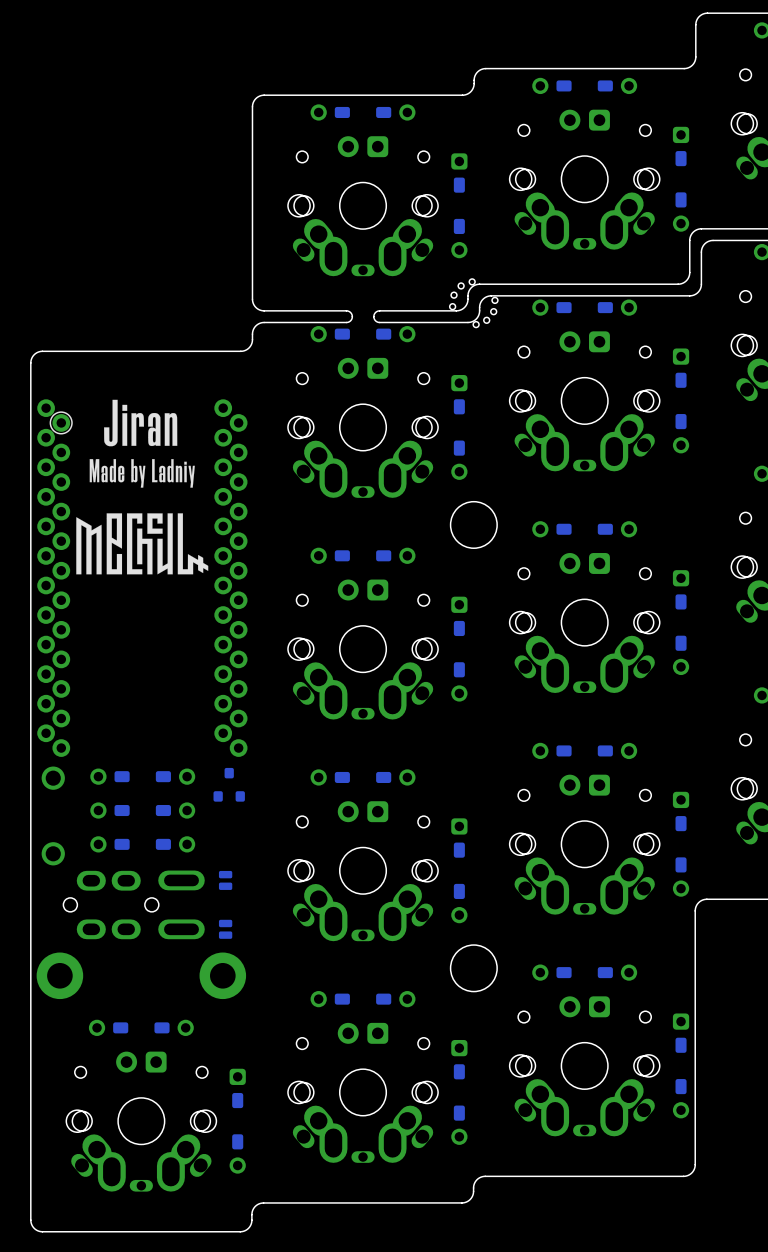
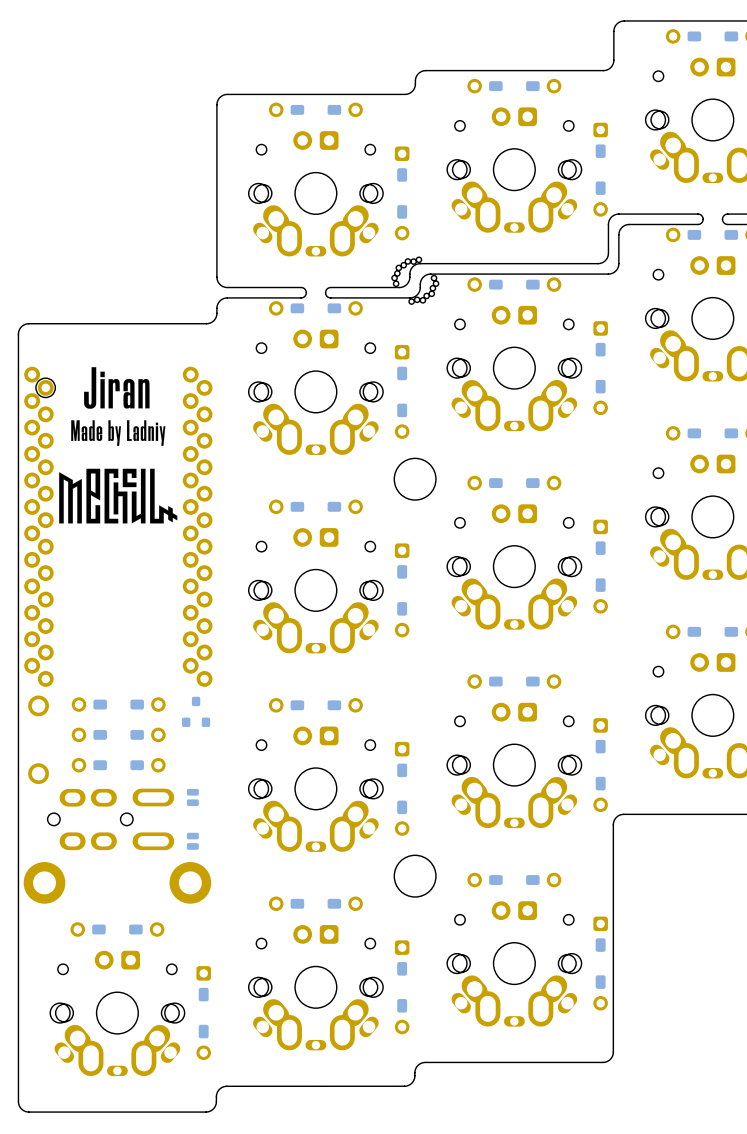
part: none -> (418, 259)
part: none -> (407, 261)
part: none -> (398, 267)
part: none -> (394, 278)
part: none -> (436, 283)
part: none -> (431, 293)
part: none -> (422, 300)
part: none -> (411, 301)

